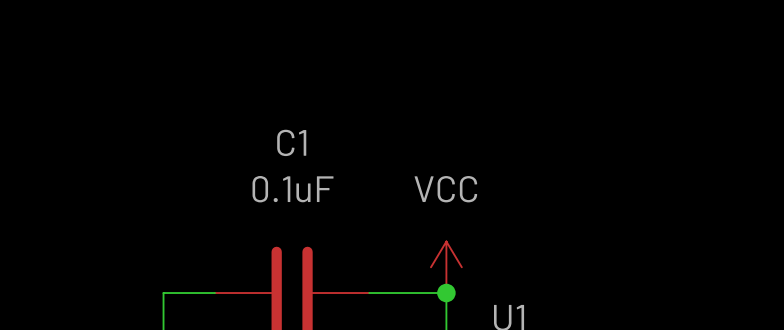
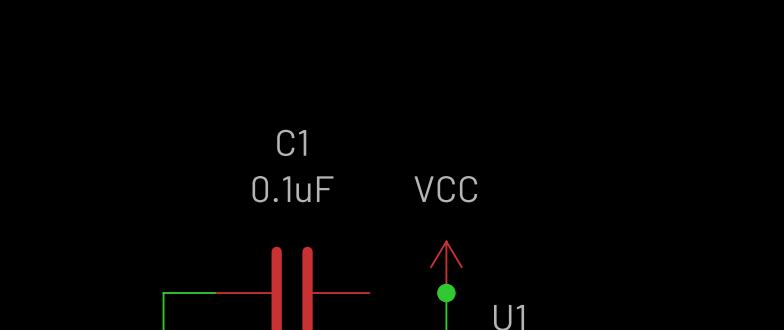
wire: (369, 293) (446, 293) -> none

